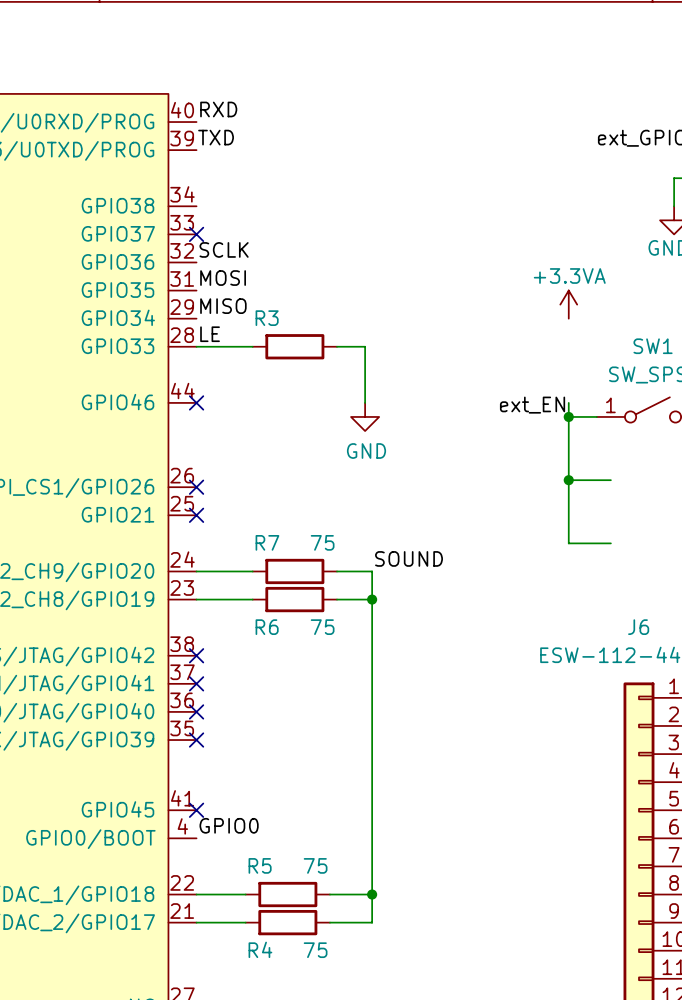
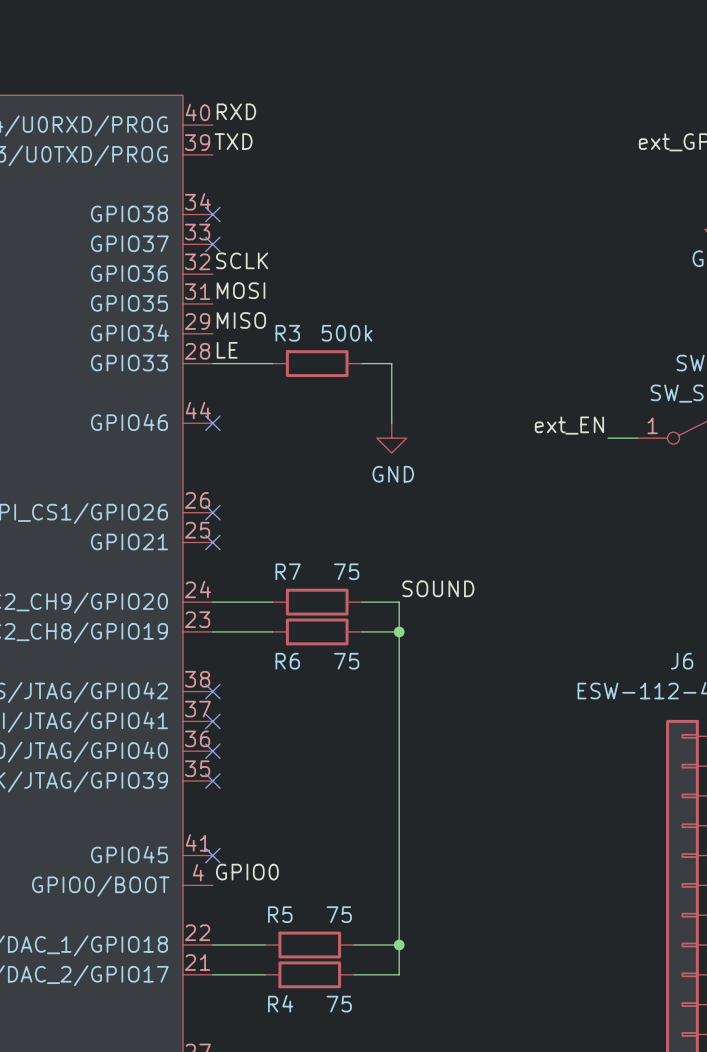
no-connect mark: none -> (212, 214)
power symbol: +3.3VA (568, 304) -> none
R3 value: none -> 500k (347, 333)
wire: (568, 402) (568, 543) (610, 543) -> none
junction: (568, 416) -> none
wire: (568, 480) (610, 480) -> none
junction: (568, 480) -> none

